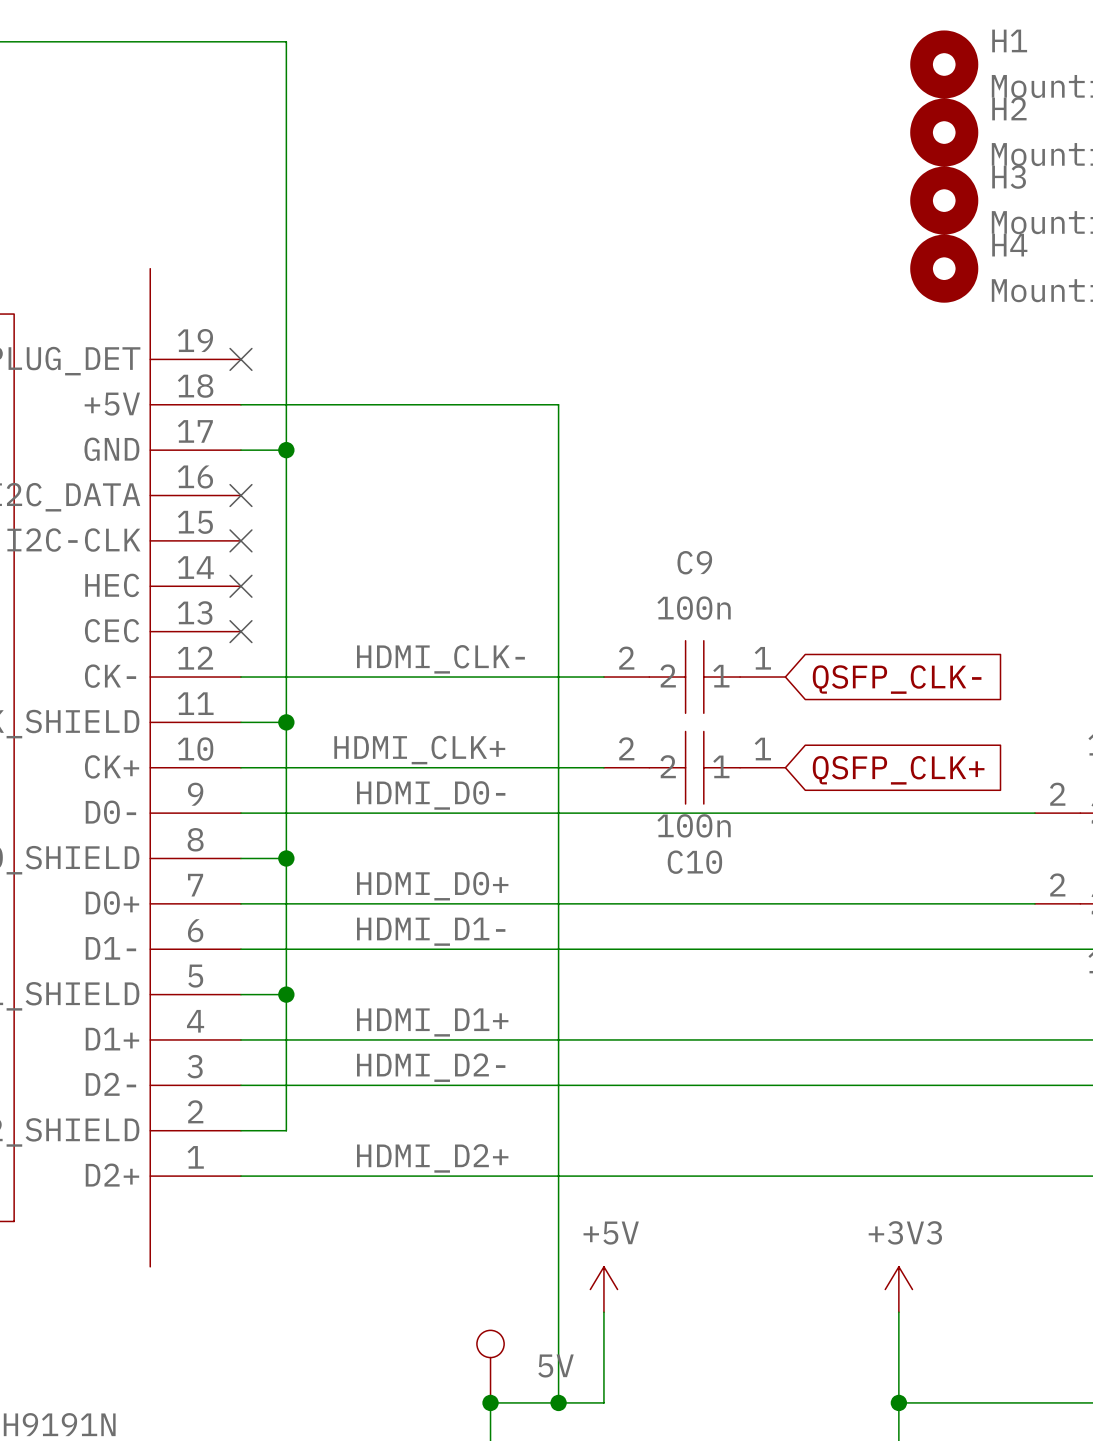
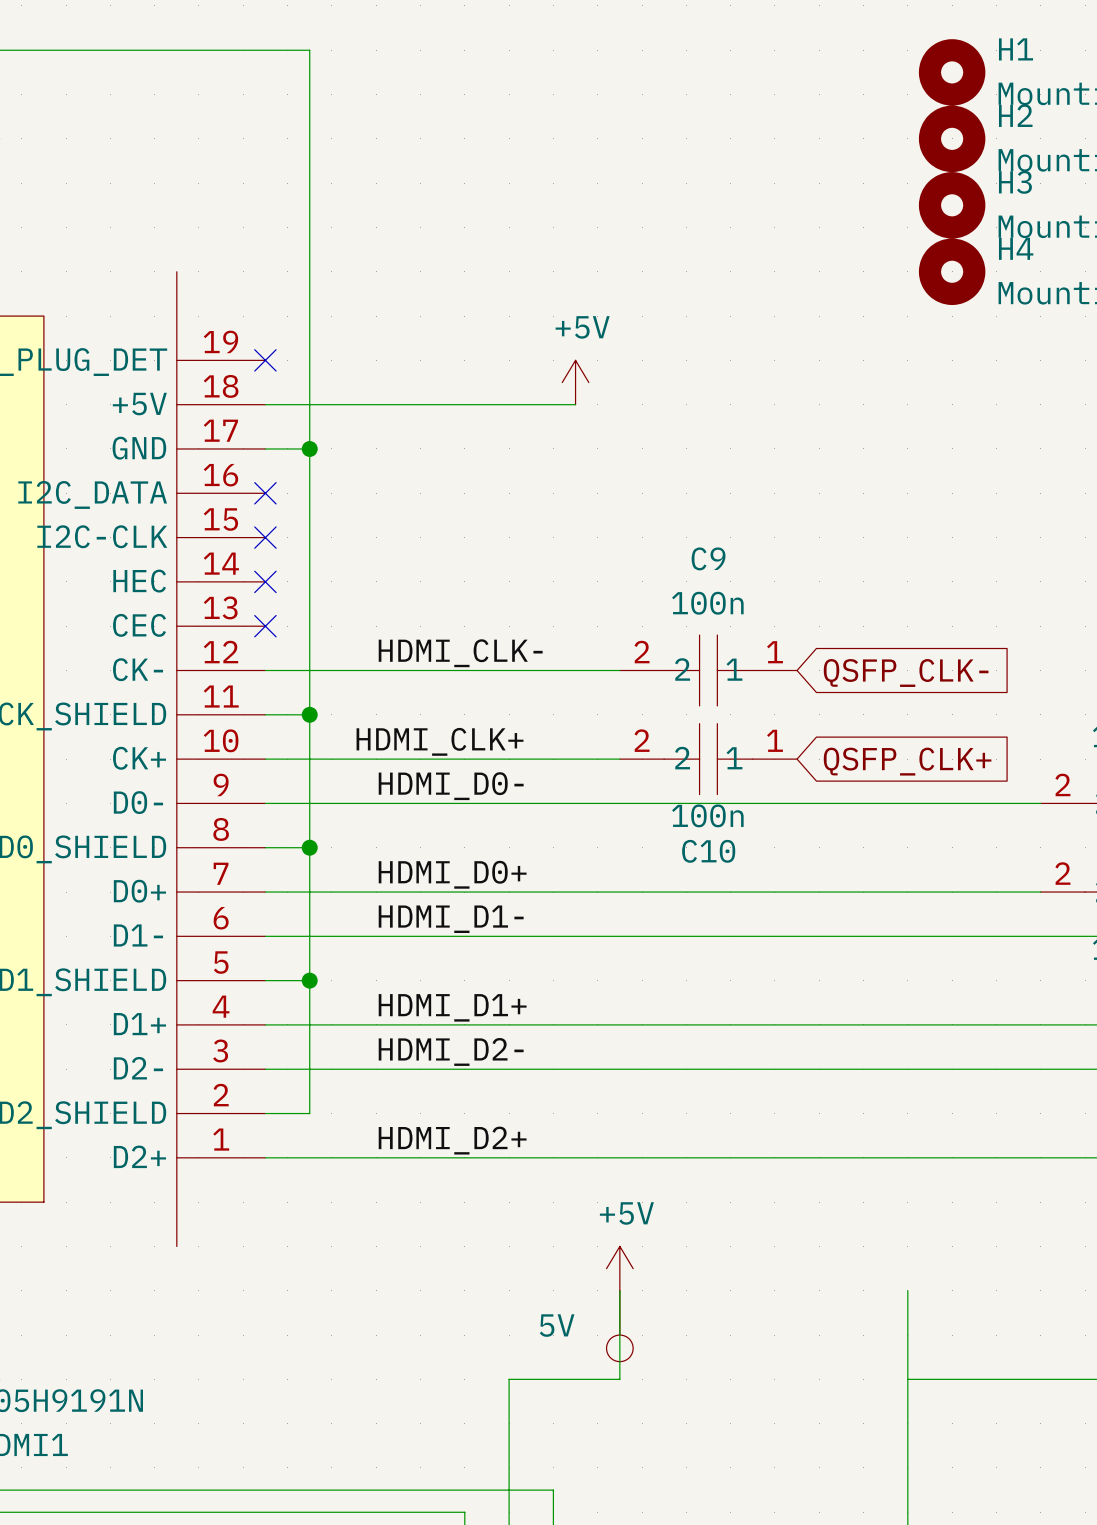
power symbol: none -> +5V (575, 382)
wire: (558, 404) (558, 1402) -> none
power symbol: +3V3 (898, 1289) -> none
part rotation: 0° (490, 1343) -> 180° (619, 1348)
part position: (490, 1366) -> (619, 1326)
junction: (490, 1402) -> none
junction: (558, 1402) -> none
junction: (898, 1402) -> none

